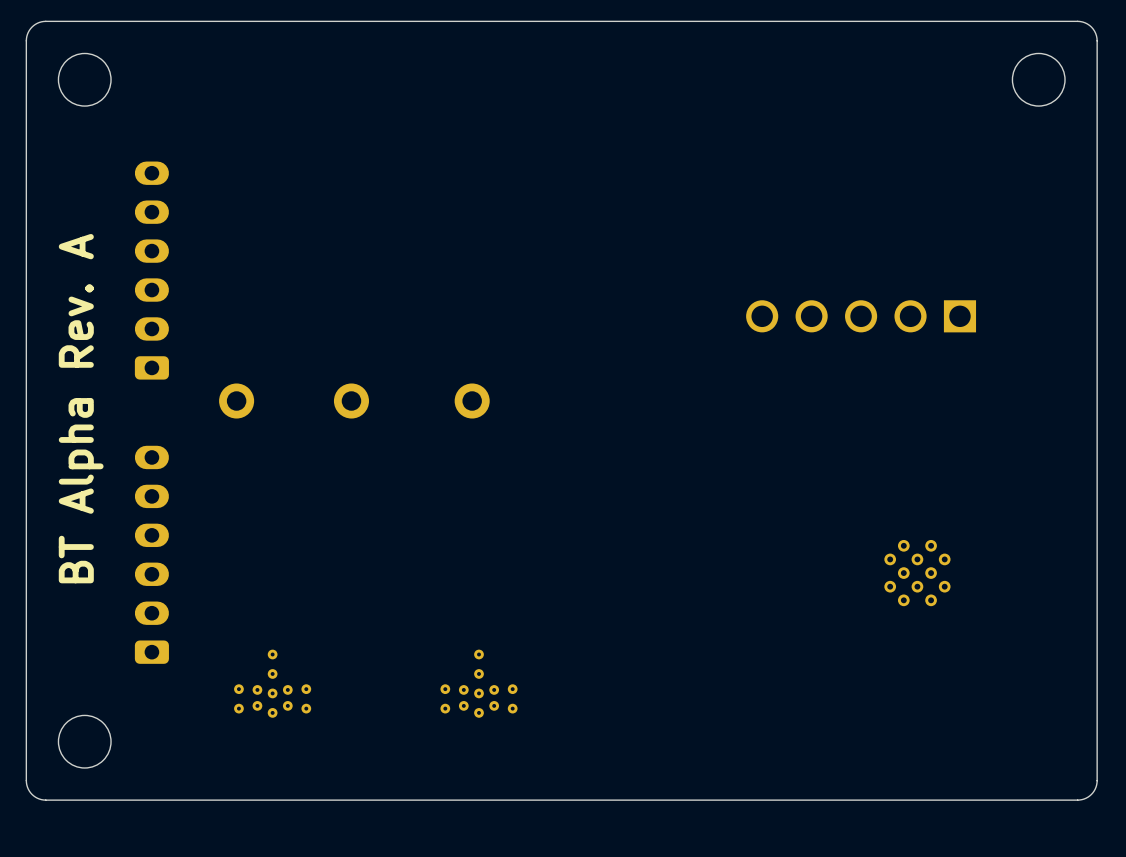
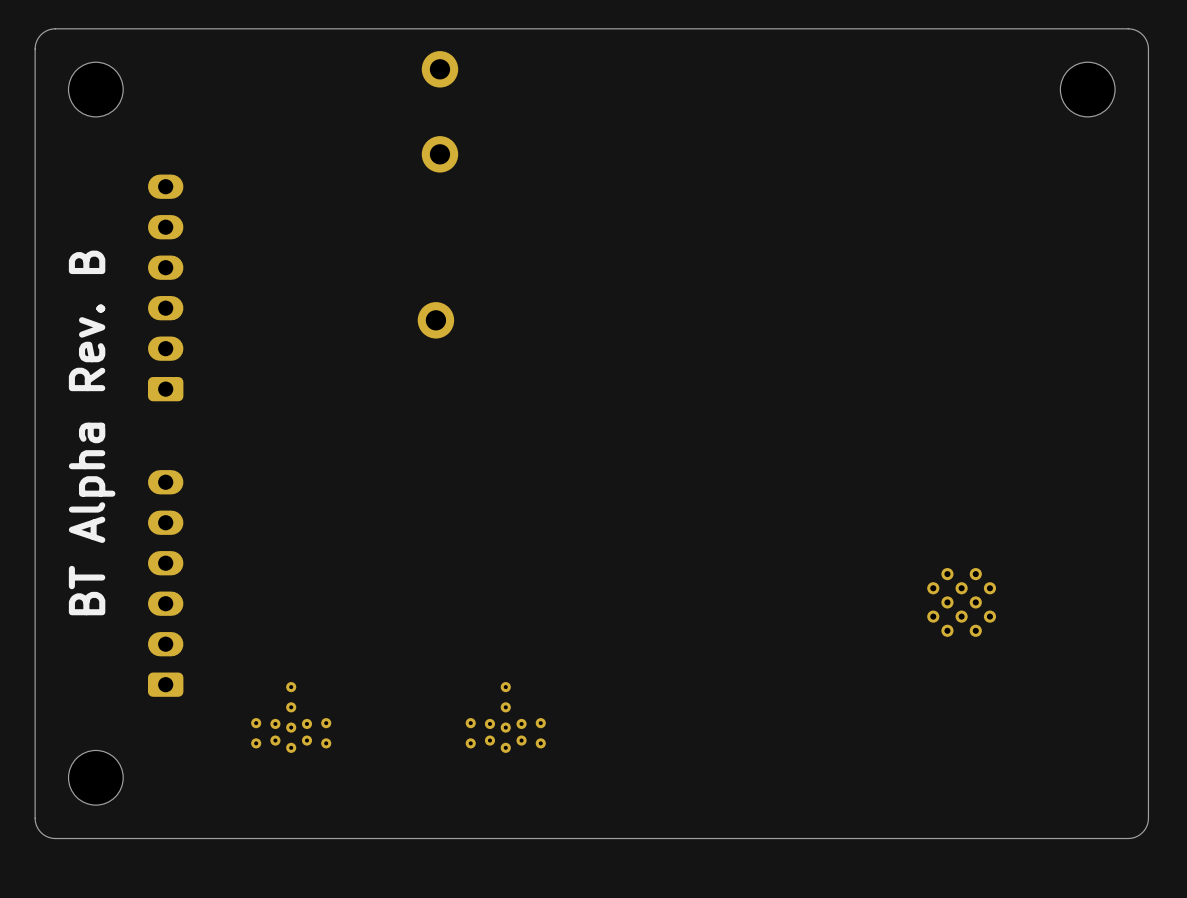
part: none -> (439, 69)
part: none -> (439, 154)
part: none -> (435, 320)
part: (861, 316) -> none
part: (236, 401) -> none
part: (351, 401) -> none
part: (472, 401) -> none
text: BT Alpha Rev. A (81, 408) -> BT Alpha Rev. B (92, 432)

